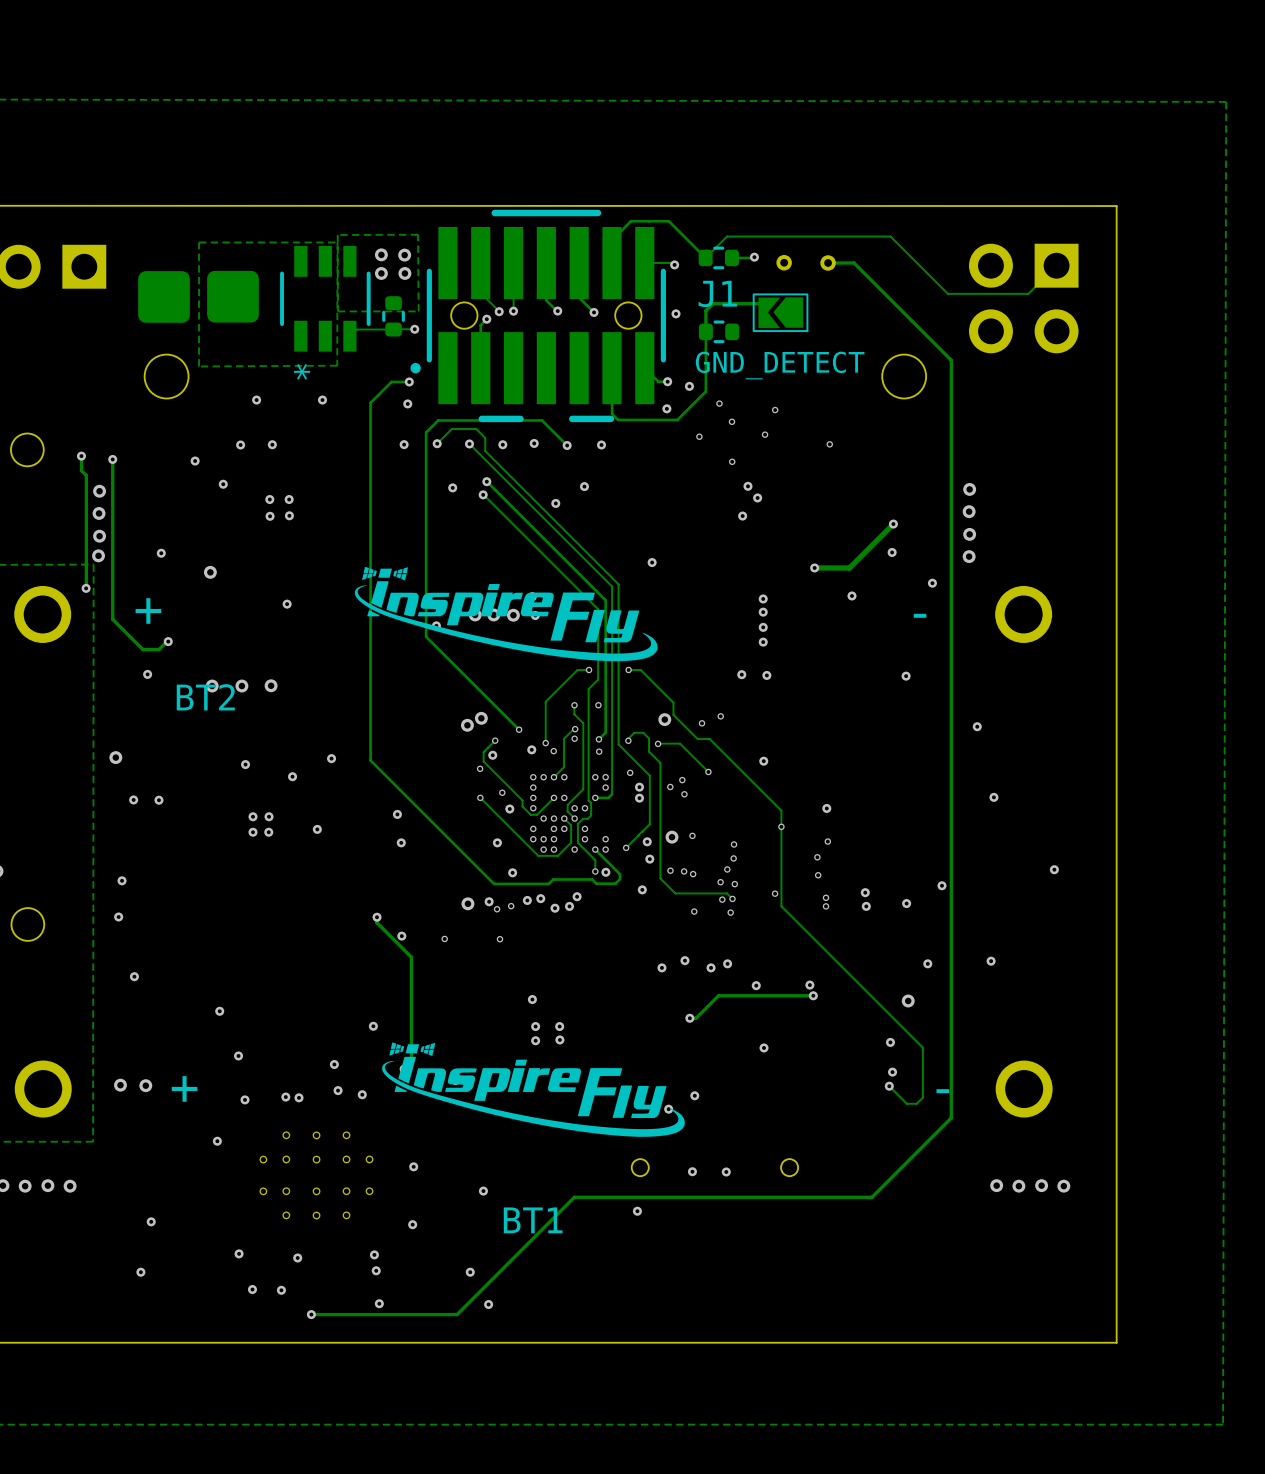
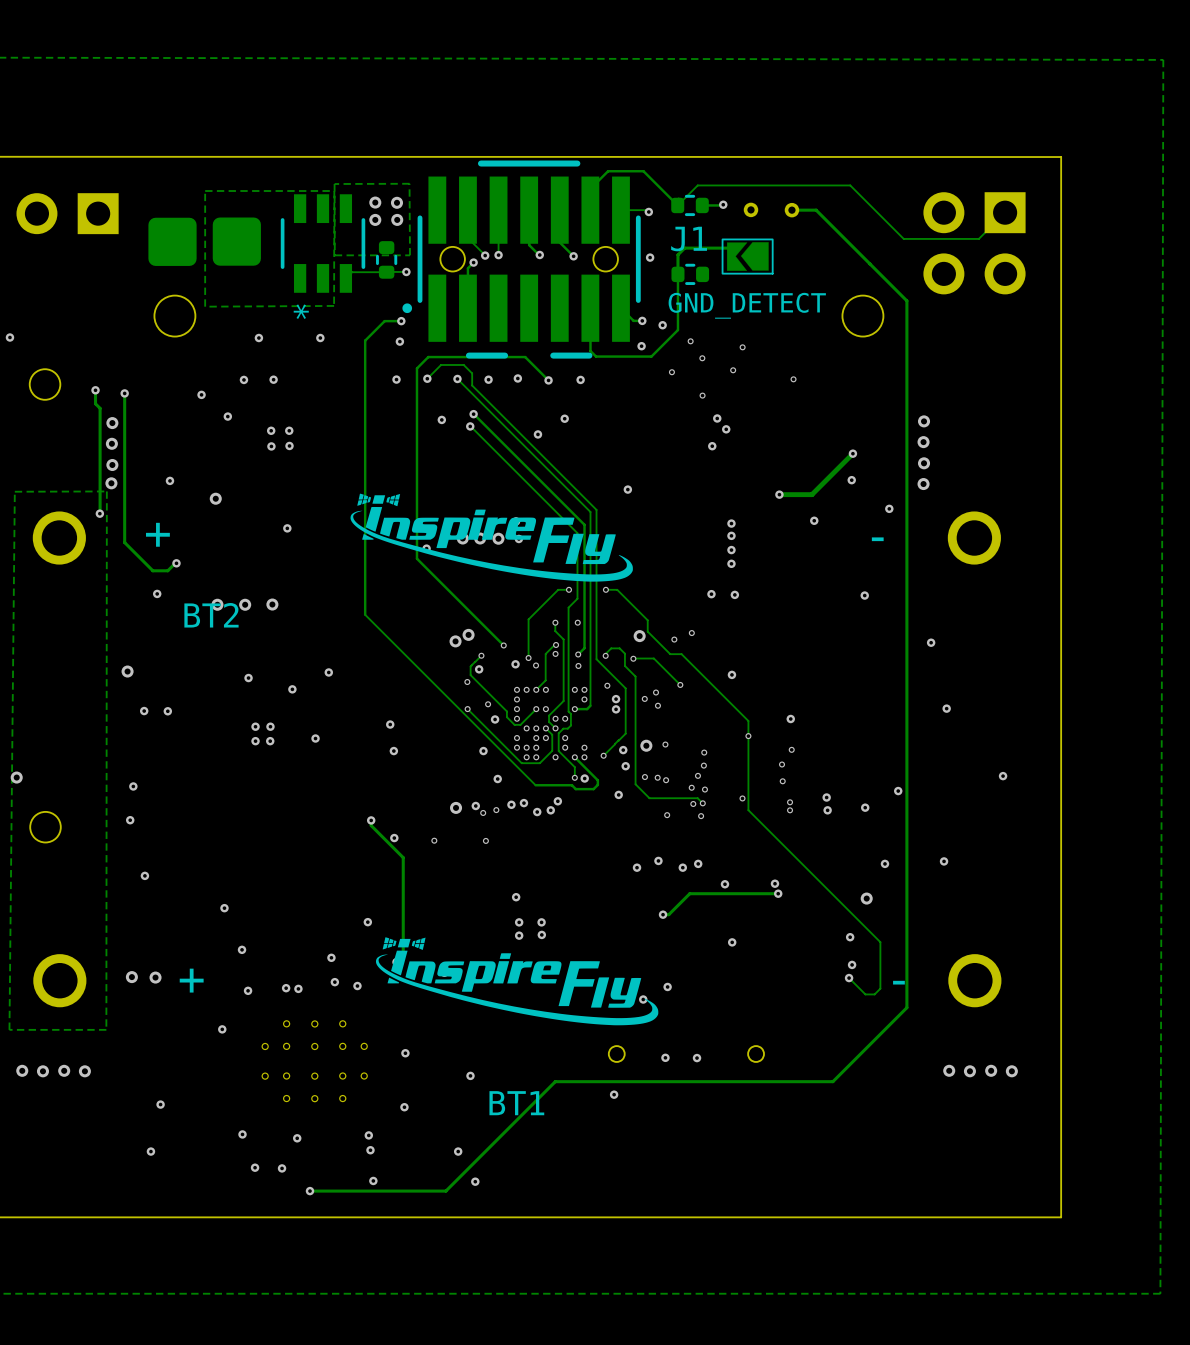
track: (370, 696) (370, 760) (494, 883) (548, 883) (553, 879) -> (365, 614) (535, 785)

